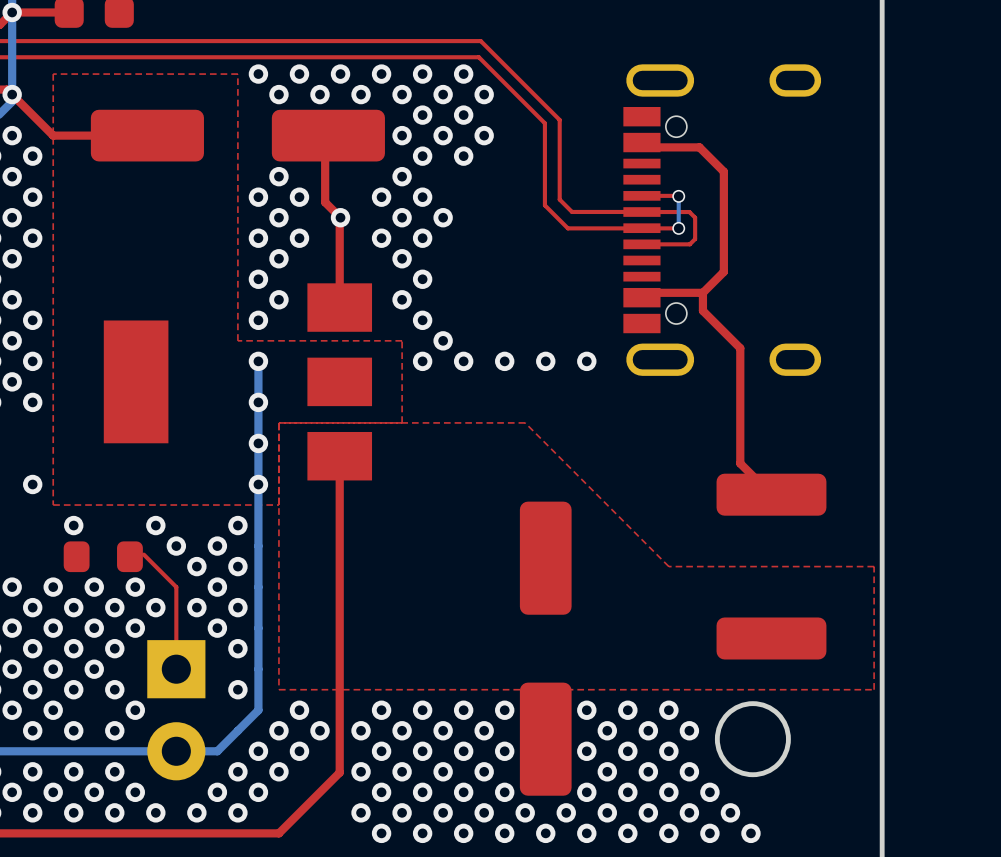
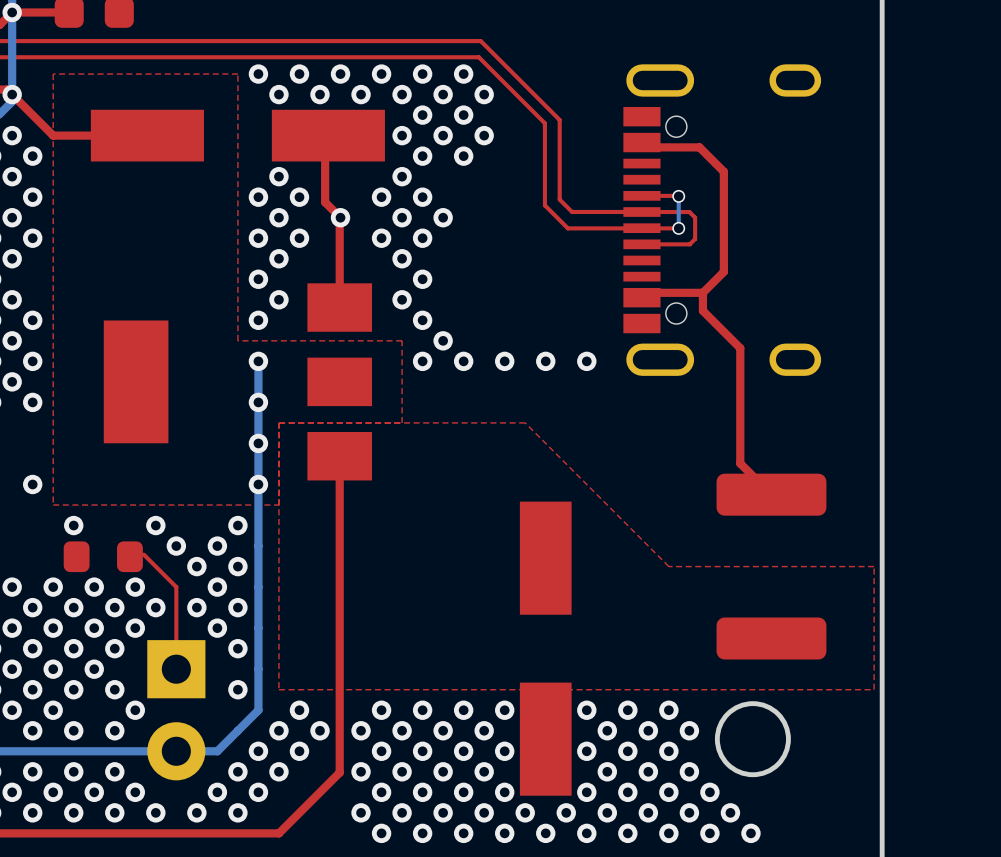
part footprint: [90, 109, 385, 162] -> [90, 109, 385, 162]
part footprint: [519, 501, 572, 796] -> [519, 501, 572, 796]

